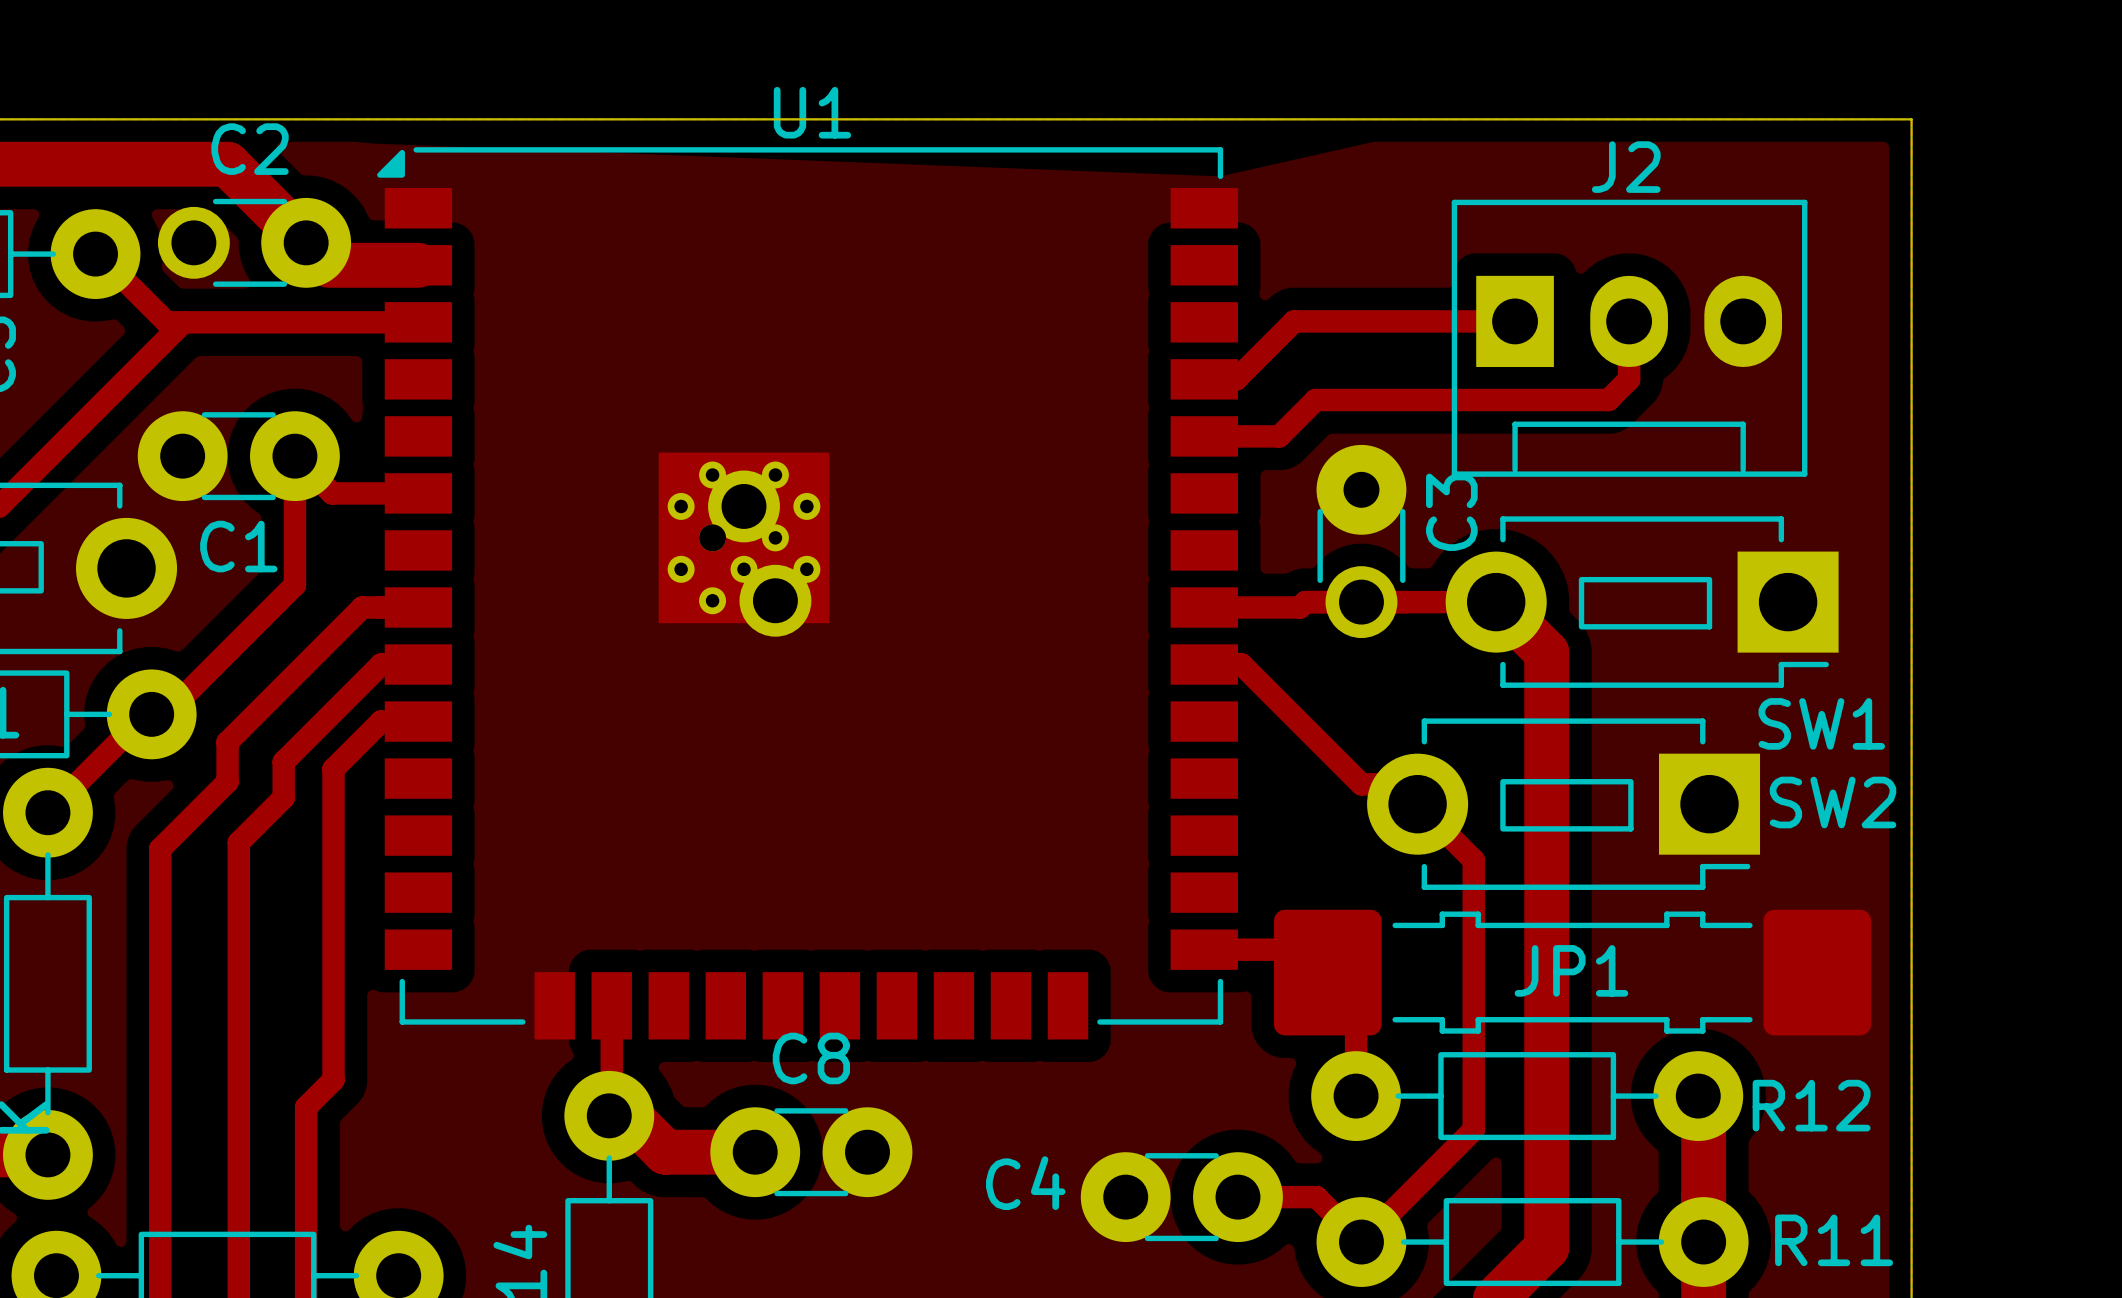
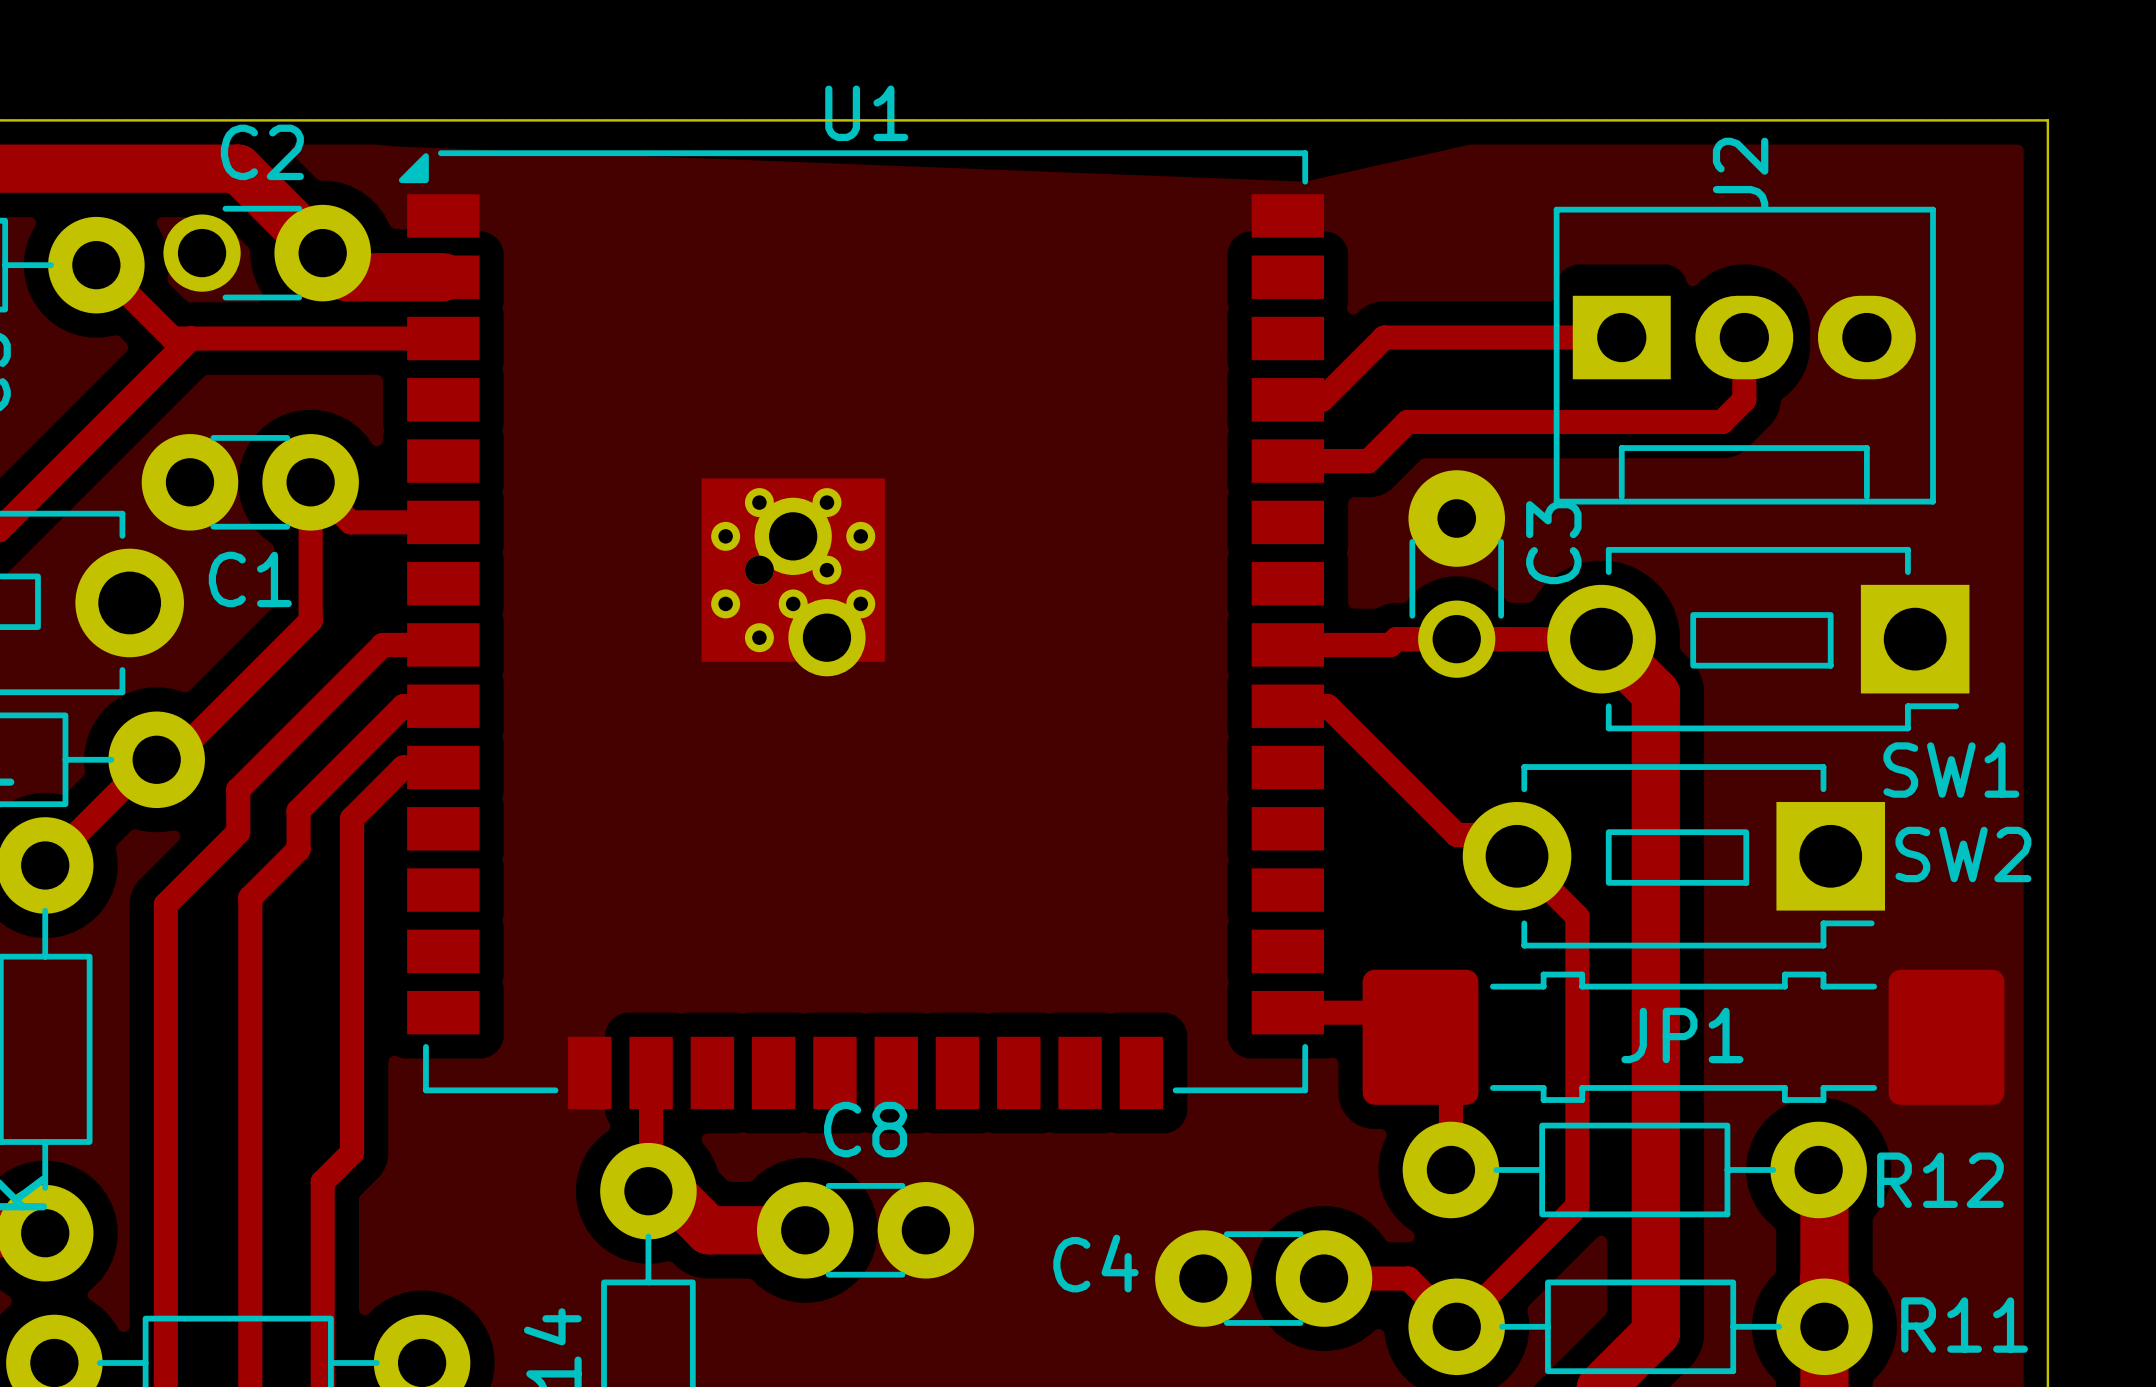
J2 name rotation: 0° (1626, 167) -> 90° counterclockwise (1740, 174)
J2 footprint: [1451, 199, 1808, 477] -> [1553, 206, 1936, 505]

